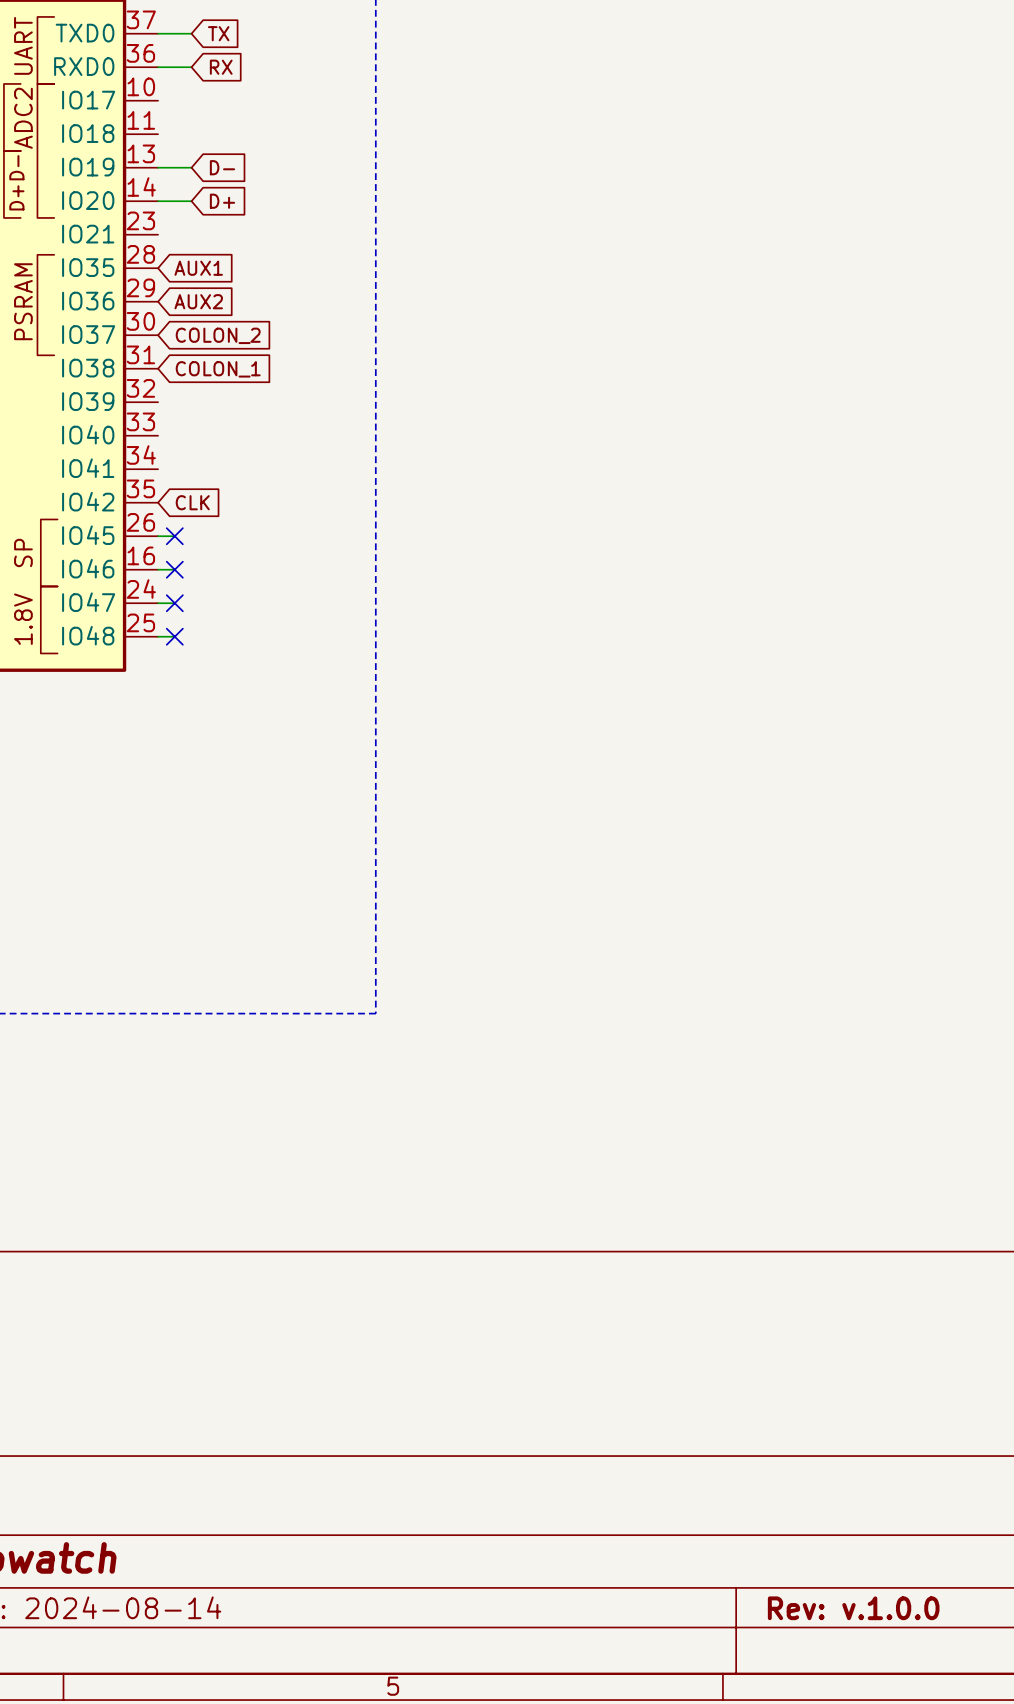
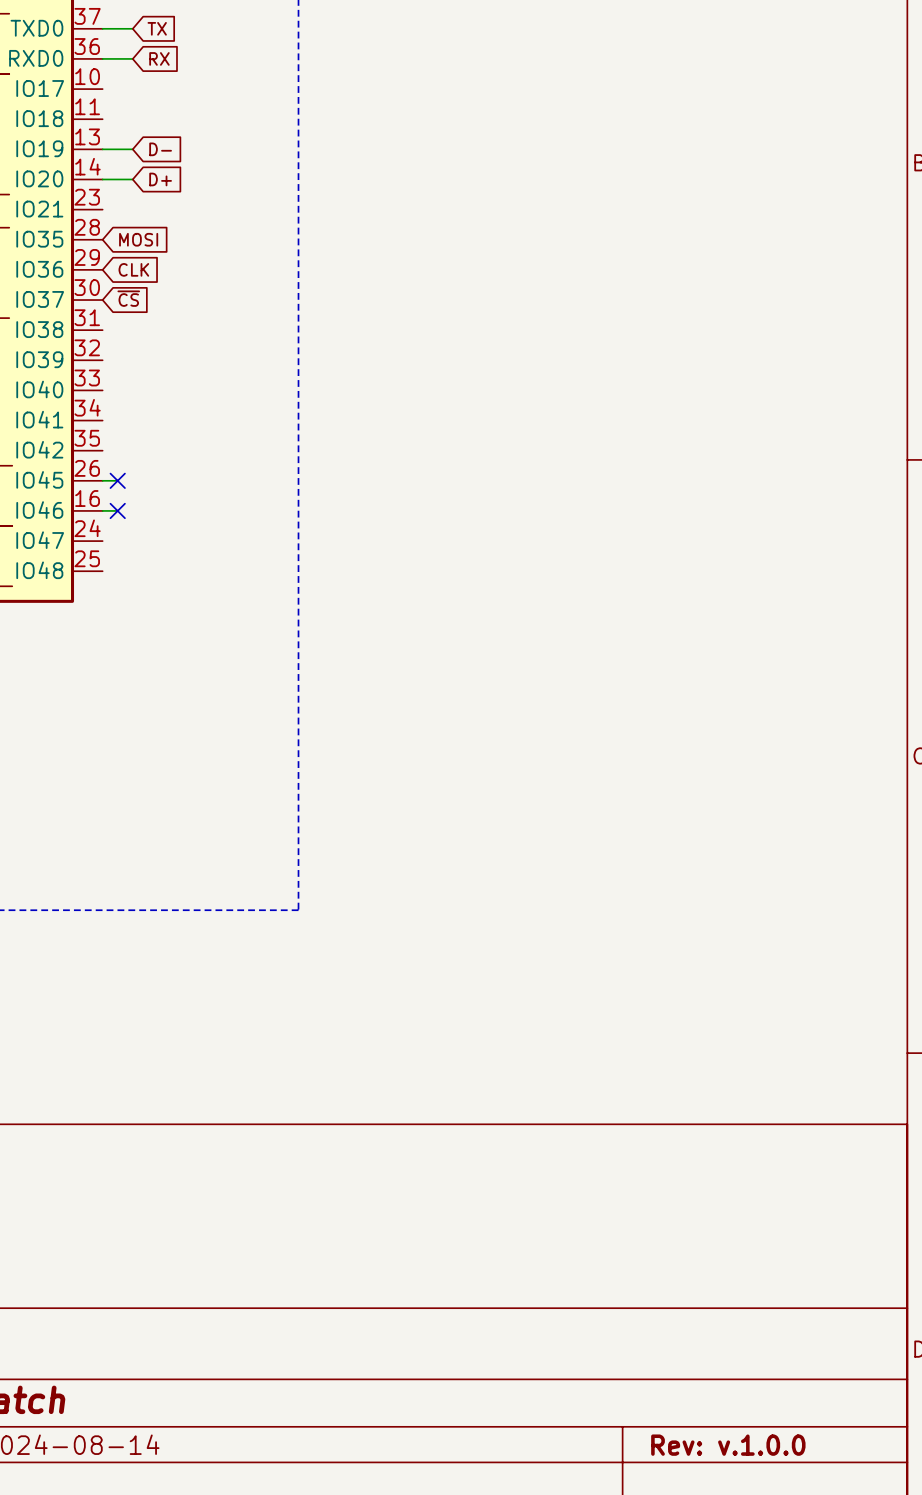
global label: AUX1 (198, 268) -> MOSI (138, 239)
global label: AUX2 (198, 301) -> CLK (133, 269)
global label: COLON_2 (218, 335) -> ~{CS} (128, 298)
global label: COLON_1 (218, 369) -> none
global label: CLK (192, 502) -> none
wire: (158, 603) (174, 603) -> none
no-connect mark: (174, 603) -> none
wire: (158, 636) (174, 636) -> none
no-connect mark: (174, 636) -> none

